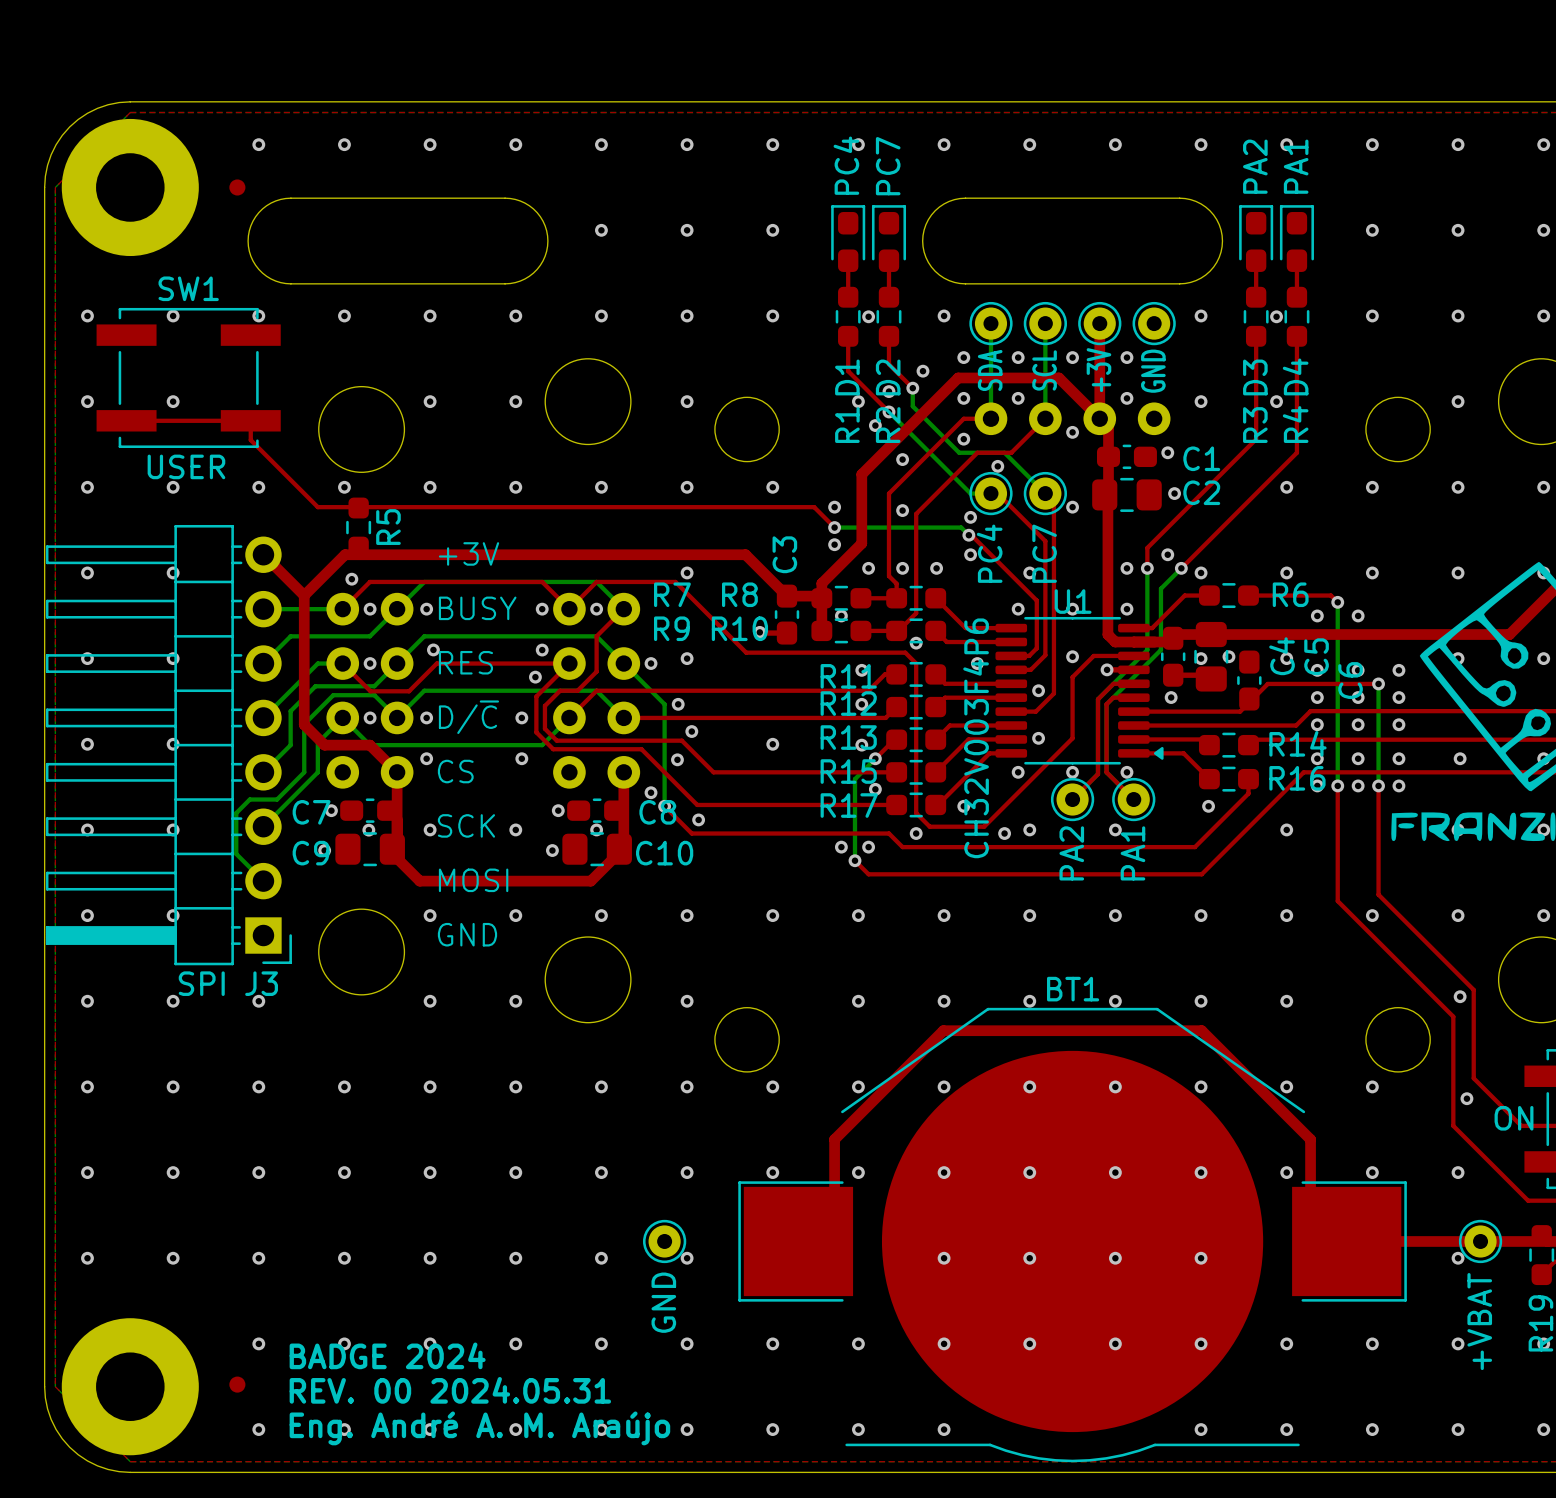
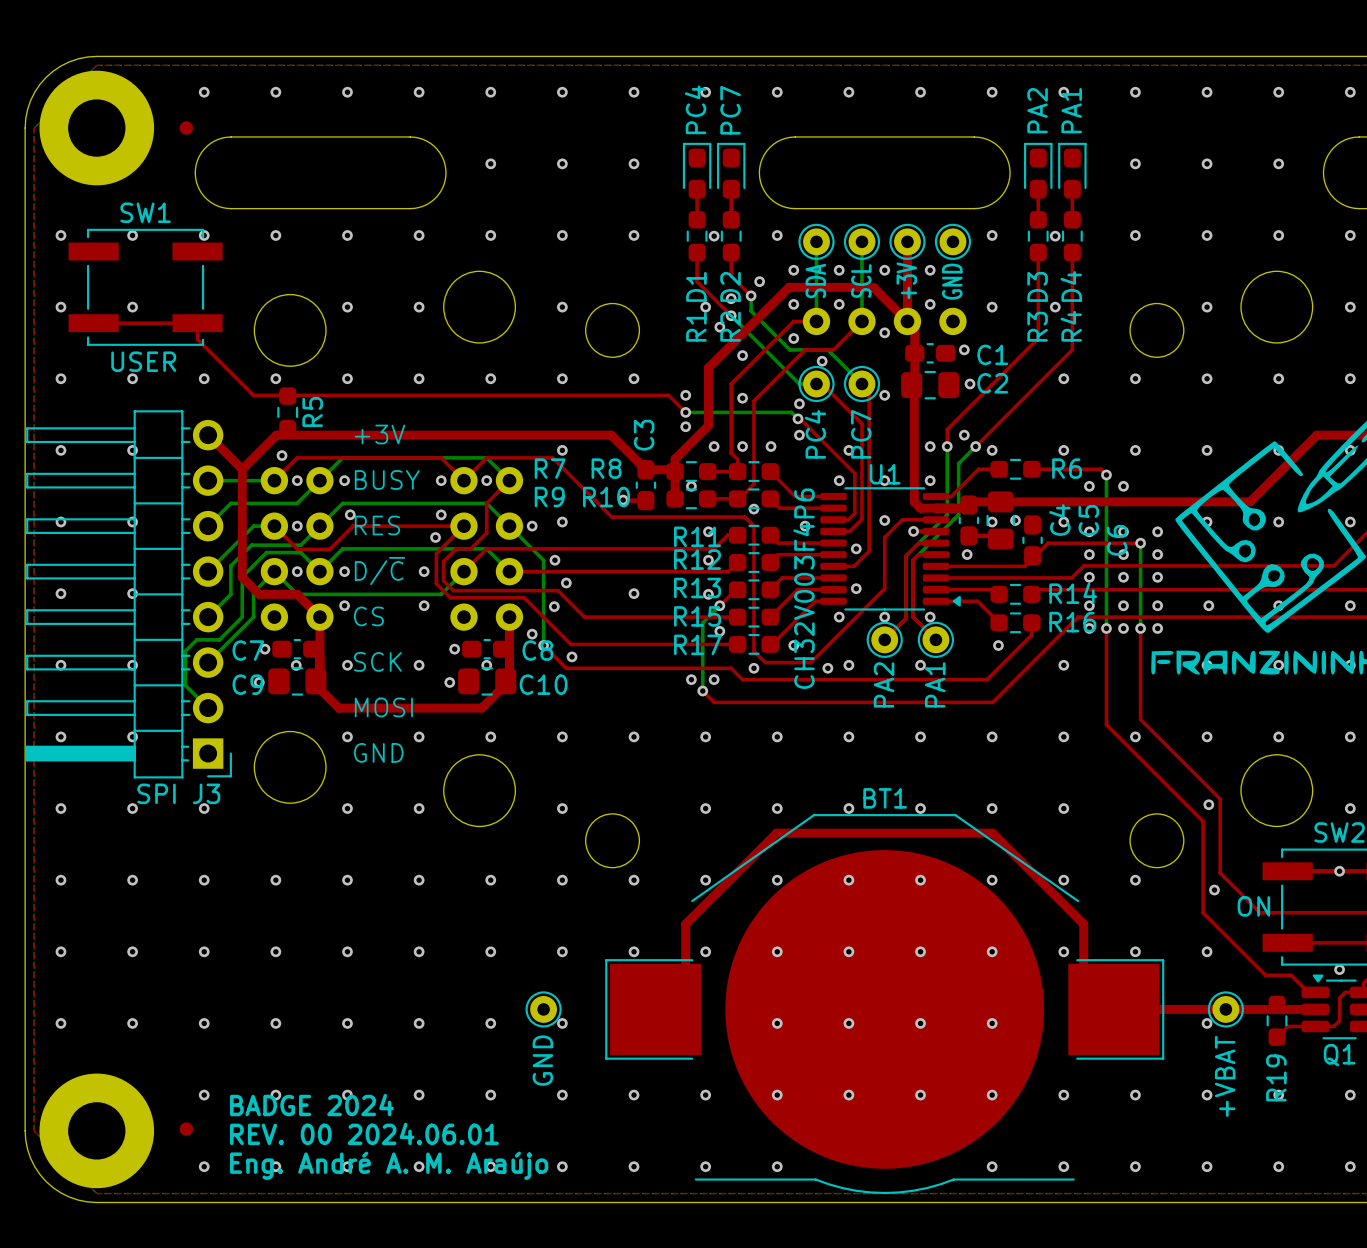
text: REV. 00 2024.05.31 (450, 1390) -> REV. 00 2024.06.01 (364, 1133)

